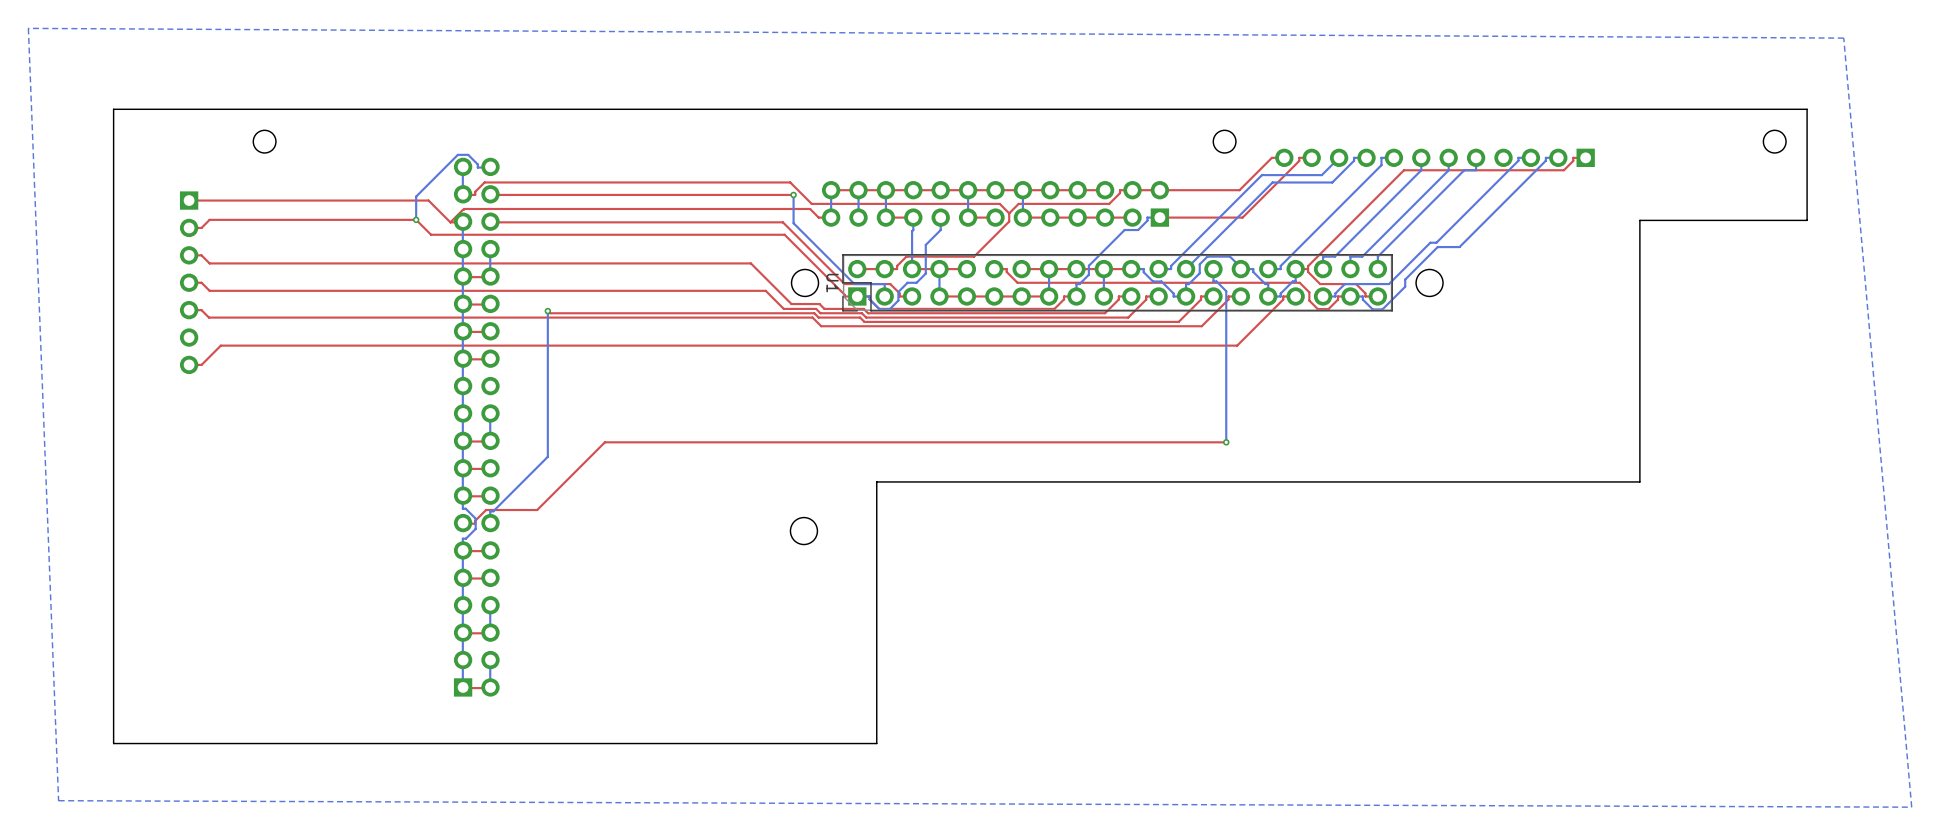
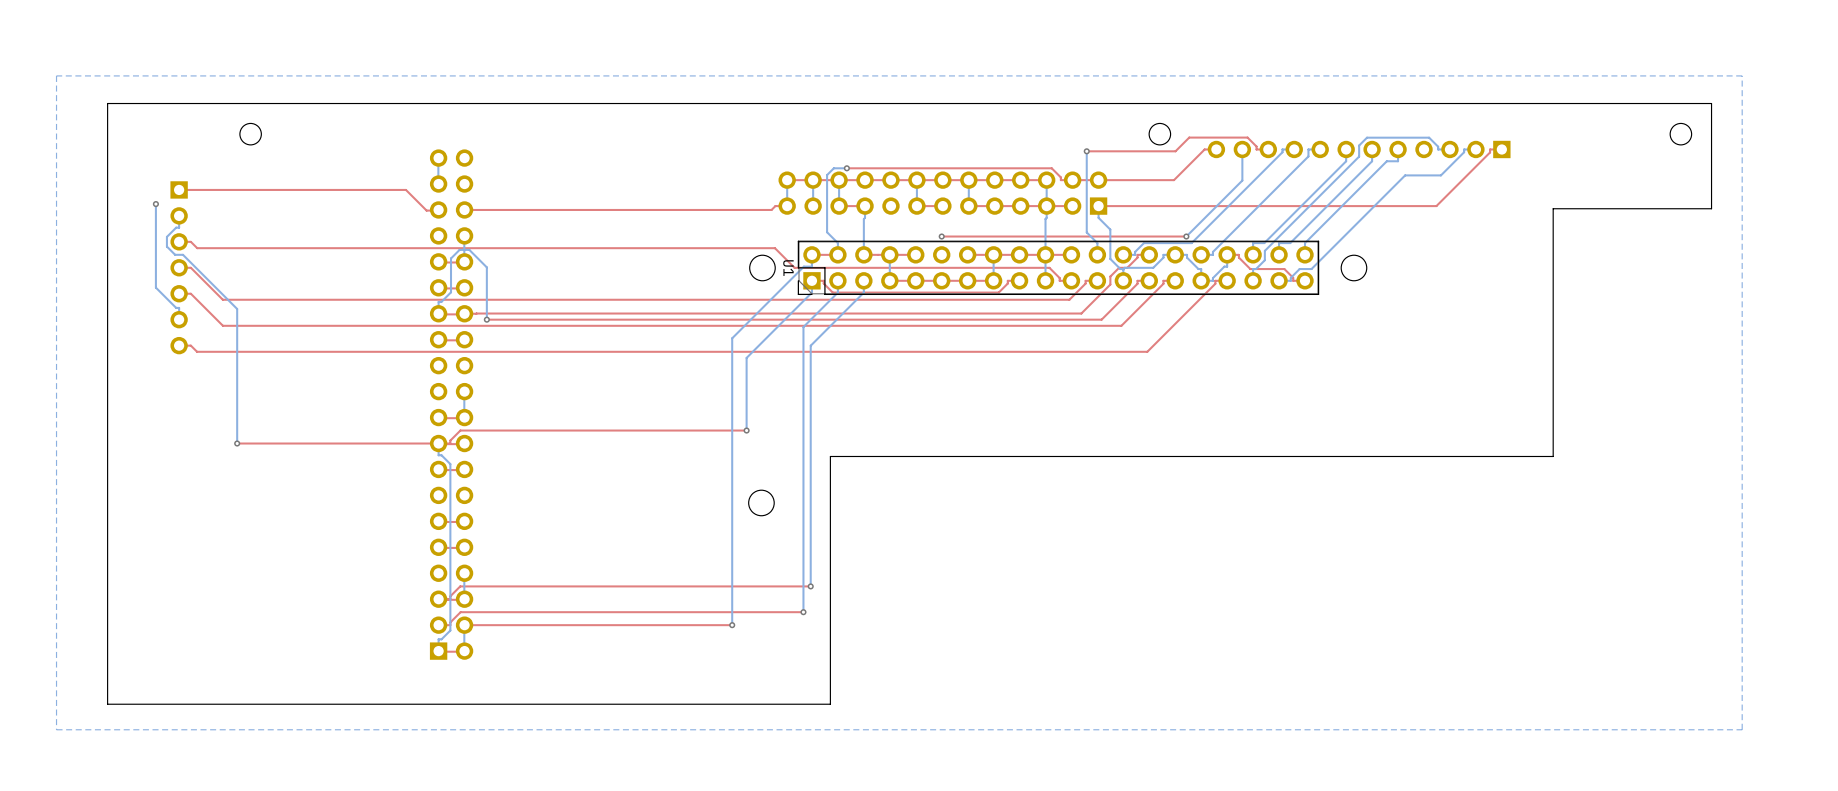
bottom zone outline: (28, 28) (1843, 38) (1911, 807) (58, 800) (28, 28) -> (1742, 75) (1742, 729) (56, 729) (56, 75) (1742, 75)
top track: (1311, 157) (1299, 157) (1299, 160) (1242, 217) -> none
bottom track: none -> (1242, 149) (1242, 180) (1186, 236)
top track: none -> (1268, 149) (1256, 149) (1256, 146) (1247, 137) (1189, 137) (1175, 151) (1086, 151)
bottom track: (1339, 157) (1321, 175) (1261, 175) (1171, 265) (1171, 269) (1158, 269) -> (1086, 151) (1086, 232) (1097, 243) (1097, 254)
bottom track: (1518, 157) (1518, 160) (1436, 242) (1430, 242) (1389, 284) (1384, 284) -> (1438, 149) (1438, 146) (1429, 137) (1367, 137) (1359, 145) (1359, 156) (1264, 250) (1264, 260) (1256, 269) (1253, 269) (1253, 280)
via: none -> (1086, 151)
bottom track: (490, 167) (477, 167) (477, 164) (468, 154) (457, 154) (416, 196) (416, 219) -> none
top track: (1563, 170) (1404, 170) (1308, 266) (1308, 269) -> (1481, 161) (1436, 206) (1176, 206)
bottom track: none -> (846, 168) (833, 168) (827, 175) (827, 232) (837, 243) (837, 254)
via: none -> (846, 168)
bottom track: (1332, 182) (1272, 182) (1186, 269) -> (1261, 172) (1191, 243) (1164, 243)
bottom track: (1521, 185) (1459, 247) (1437, 247) (1405, 279) (1405, 286) (1382, 309) (1372, 309) (1362, 299) (1362, 296) -> (1440, 175) (1405, 175) (1311, 269)
bottom track: none -> (1046, 180) (1045, 254)
top track: (1120, 190) (1120, 193) (1109, 203) (1018, 203) (1009, 213) -> (1060, 180) (1060, 177) (1051, 168) (846, 168)
top track: (462, 194) (475, 194) (475, 191) (484, 182) (790, 182) (811, 203) (999, 203) (1009, 213) -> none
top track: (793, 194) (490, 194) -> none
bottom track: (793, 194) (793, 223) (854, 284) (884, 284) (884, 296) -> (803, 612) (803, 327) (837, 292) (837, 280)
via: (793, 194) -> none
top track: (1009, 213) (1009, 221) (974, 256) (906, 256) (897, 265) (897, 269) (884, 269) -> none
bottom track: none -> (155, 204) (155, 287) (176, 307) (179, 307) (179, 319)
via: none -> (155, 204)
top track: (818, 217) (810, 208) (464, 208) (450, 222) -> (775, 206) (771, 209) (464, 209)
bottom track: (940, 217) (940, 230) (925, 244) (925, 273) (916, 282) (907, 282) (898, 291) (898, 300) (889, 309) (879, 309) (869, 299) (869, 296) (857, 296) -> (746, 430) (746, 357) (811, 292) (811, 280)
bottom track: (1159, 217) (1147, 217) (1147, 220) (1138, 230) (1124, 230) (1088, 265) (1088, 274) (1079, 284) (1076, 284) (1076, 296) -> (1098, 206) (1098, 217) (1110, 229) (1110, 258) (1120, 269) (1153, 267) (1163, 257) (1163, 254) (1175, 254)
via: (416, 219) -> none
bottom track: (462, 222) (462, 508) (465, 508) (475, 518) (475, 528) (465, 538) (462, 538) (462, 688) -> none
top track: (490, 222) (782, 222) (844, 284) (890, 284) (899, 293) (899, 296) (912, 296) -> none
top track: (189, 227) (201, 227) (209, 219) (416, 219) (431, 234) (784, 234) (844, 296) (857, 296) -> none
bottom track: none -> (179, 215) (179, 227) (176, 227) (166, 236) (166, 246) (175, 254) (183, 254) (237, 308) (237, 443)
via: none -> (941, 236)
top track: none -> (1186, 236) (941, 236)
via: none -> (1186, 236)
bottom track: (1207, 256) (1199, 264) (1199, 273) (1188, 284) (1186, 284) -> (1143, 243) (1135, 251) (1135, 254) (1123, 254)
bottom track: (1230, 256) (1242, 269) -> none
top track: (208, 262) (750, 263) (791, 304) (819, 304) (824, 308) (863, 308) (868, 313) (1105, 313) (1118, 299) (1118, 296) -> (197, 248) (774, 248) (794, 267) (963, 267)
bottom track: none -> (811, 254) (811, 266) (803, 266) (732, 338) (732, 625)
top track: (994, 269) (1006, 269) (1006, 271) (1017, 282) -> none
bottom track: (1131, 269) (1143, 269) (1143, 272) (1153, 281) (1161, 281) (1173, 293) (1173, 296) (1186, 296) -> none
bottom track: (1213, 269) (1213, 281) (1216, 281) (1226, 291) (1226, 442) -> none
top track: (1181, 282) (1108, 282) -> (1059, 280) (1059, 278) (1049, 267)
top track: none -> (1119, 267) (1110, 276) (1110, 284) (1081, 313) (464, 313)
top track: (1190, 282) (1299, 282) (1309, 292) (1309, 300) (1317, 309) (1328, 309) (1338, 299) (1338, 296) (1350, 296) -> (1127, 267) (1137, 257) (1137, 254) (1149, 254)
bottom track: (1372, 284) (1344, 284) (1335, 293) (1335, 296) (1323, 296) -> (1299, 269) (1290, 277) (1290, 280)
top track: (209, 290) (765, 290) (783, 308) (816, 308) (820, 313) (861, 313) (866, 317) (1128, 317) (1146, 299) -> (198, 275) (222, 299) (1069, 299) (1085, 283)
bottom track: none -> (863, 280) (863, 292) (810, 345) (810, 586)
top track: (547, 311) (550, 313) (814, 313) (818, 317) (860, 317) (864, 321) (1178, 321) -> (486, 319) (1101, 319) (1116, 304)
bottom track: (547, 311) (547, 456) (493, 511) (490, 511) (490, 523) -> none
via position: (547, 311) -> (486, 319)
top track: (208, 317) (812, 317) (821, 326) (1201, 326) -> (197, 300) (222, 325) (1121, 325) (1138, 308)
bottom track: none -> (438, 313) (438, 302) (441, 302) (451, 292) (451, 258) (459, 249) (469, 249) (486, 267) (486, 319)
top track: (1237, 345) (220, 345) (201, 364) -> (1171, 327) (1147, 351) (197, 351) (190, 345)
top track: (1226, 442) (604, 442) (537, 510) (486, 510) (475, 520) (475, 523) (462, 523) -> none
via: (1226, 442) -> none
top track: none -> (746, 430) (460, 430) (450, 440) (450, 443) (237, 443)
via: none -> (746, 430)
via: none -> (237, 443)
bottom track: none -> (438, 443) (438, 455) (441, 455) (450, 464) (450, 630) (441, 639) (438, 639) (438, 651)
top track: none -> (810, 586) (460, 586) (450, 596) (450, 599) (438, 599)
via: none -> (810, 586)
top track: none -> (803, 612) (460, 612) (450, 622) (450, 625) (438, 625)
via: none -> (803, 612)
top track: none -> (732, 625) (464, 625)
via: none -> (732, 625)

